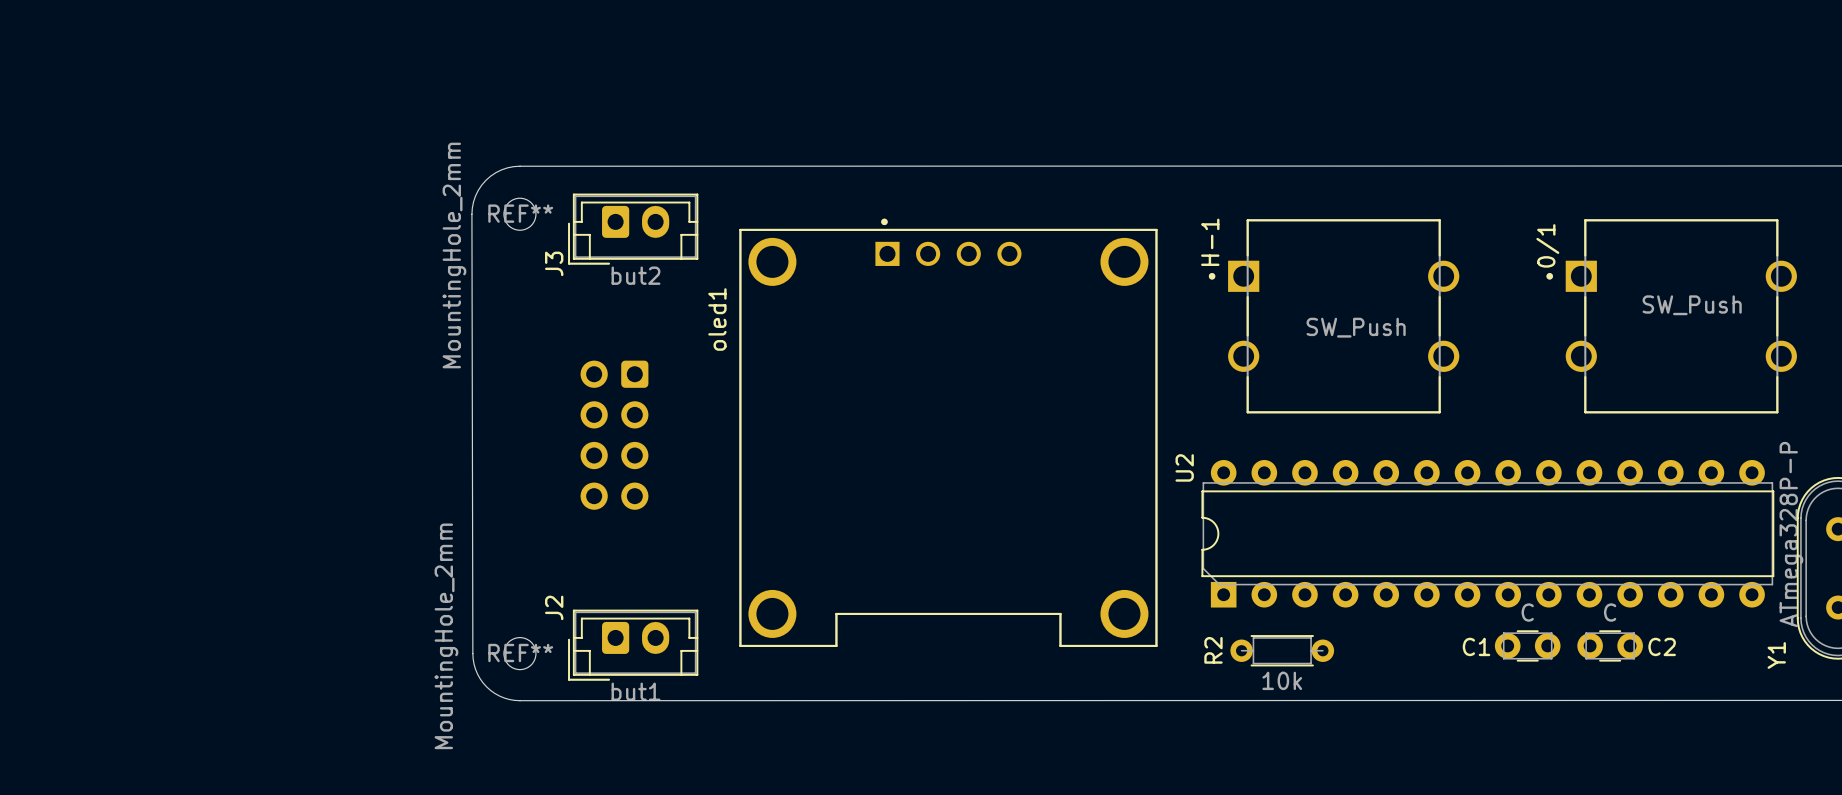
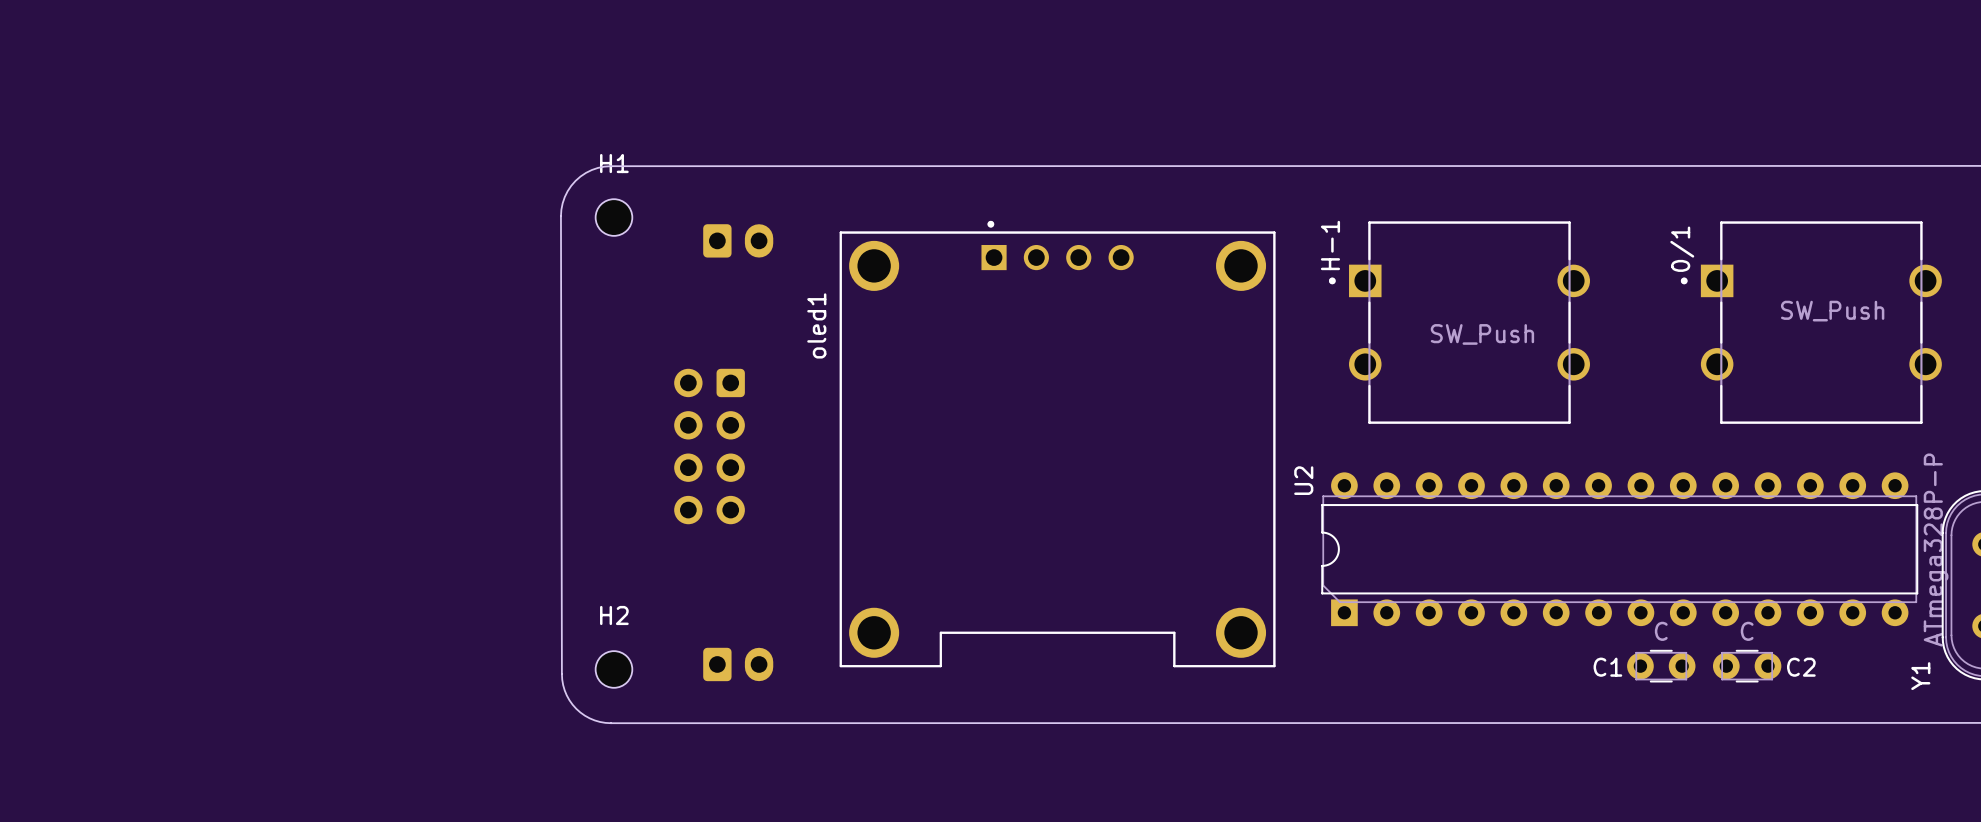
REF**: MountingHole_2mm (519, 214) -> none
H1: none -> (613, 217)
J3 side: top (633, 229) -> bottom (738, 240)
J2 side: top (633, 645) -> bottom (738, 664)
H2: none -> (613, 669)
R2: 10k (1282, 650) -> none
REF**: MountingHole_2mm (519, 653) -> none

